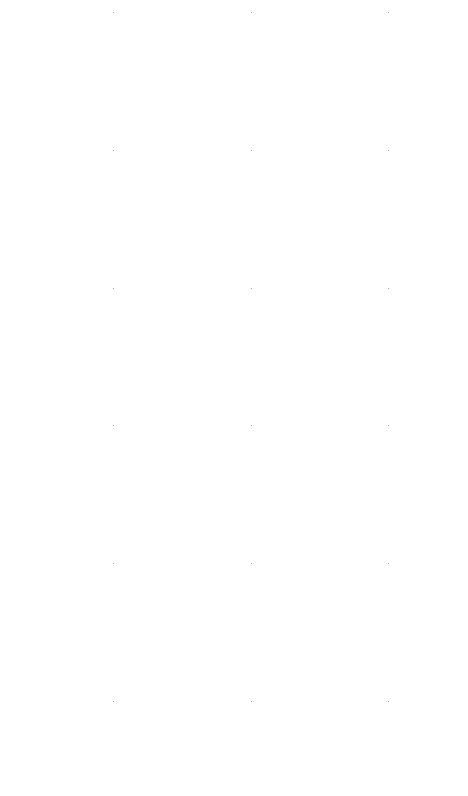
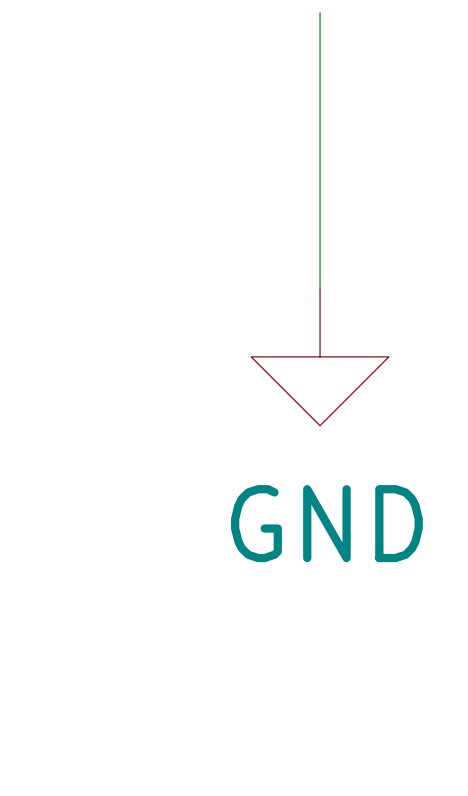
wire: none -> (320, 12) (320, 288)
power symbol: none -> GND (320, 356)

